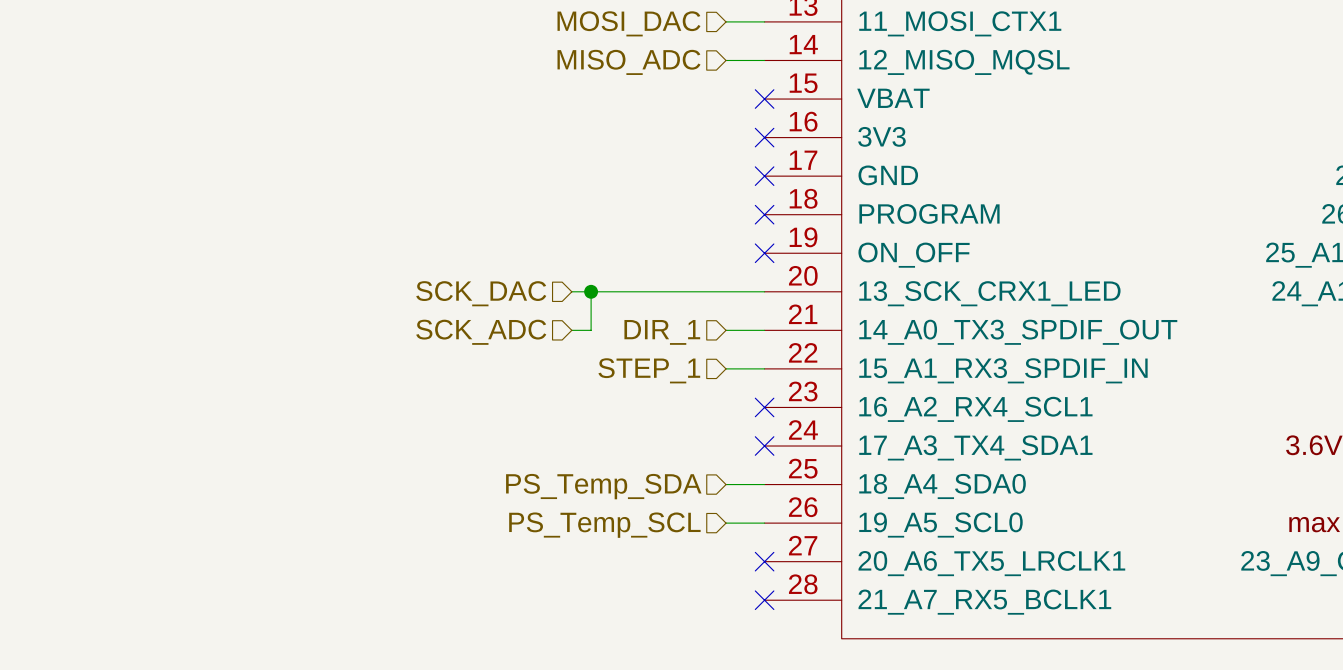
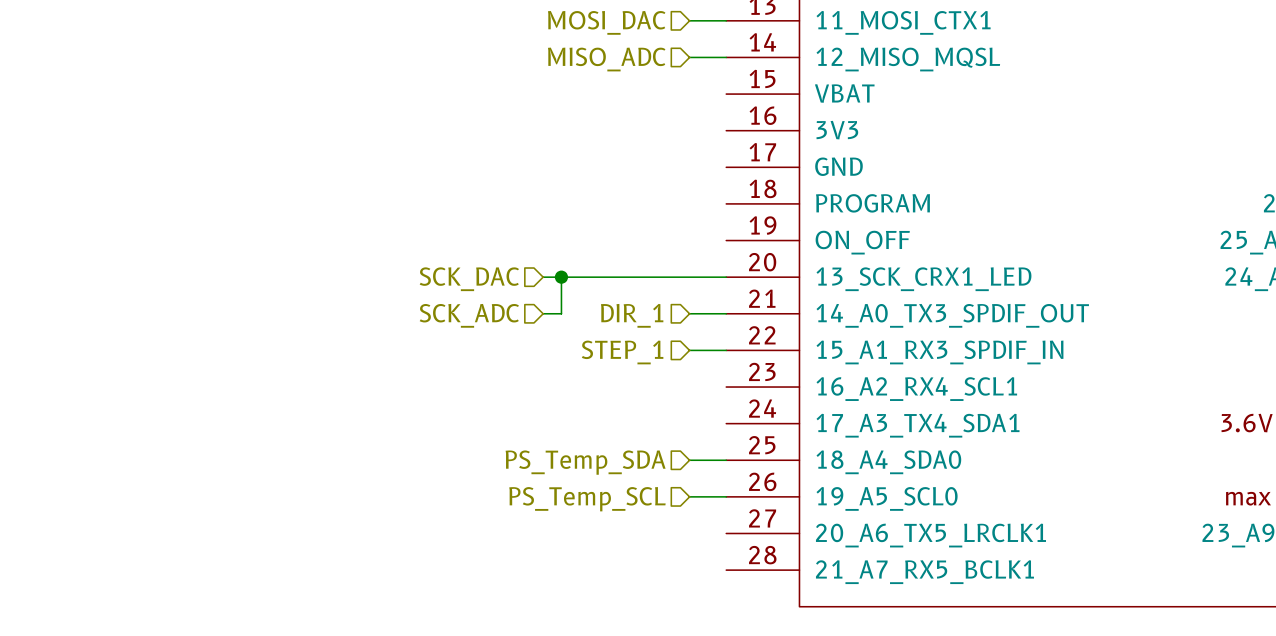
no-connect mark: (764, 99) -> none
no-connect mark: (764, 137) -> none
no-connect mark: (764, 176) -> none
no-connect mark: (764, 214) -> none
no-connect mark: (764, 253) -> none
no-connect mark: (764, 407) -> none
no-connect mark: (764, 446) -> none
no-connect mark: (764, 561) -> none
no-connect mark: (764, 600) -> none

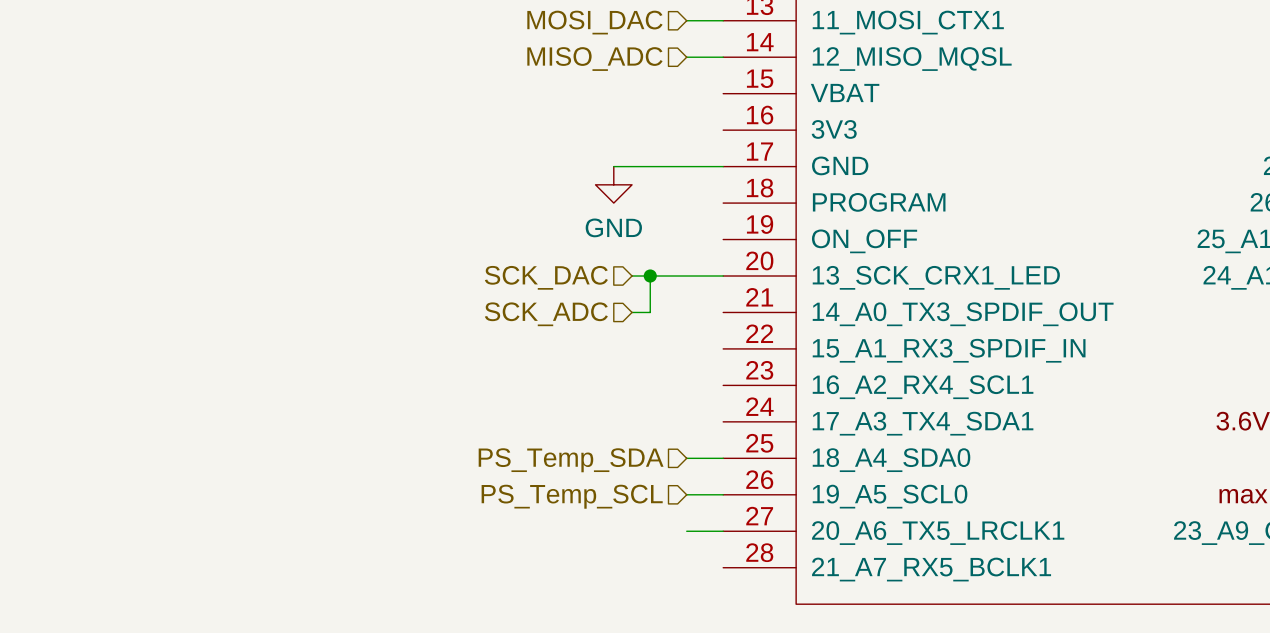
wire: none -> (613, 166) (723, 166)
power symbol: none -> GND (613, 184)
wire: (543, 277) (634, 277) -> none
wire: (561, 277) (561, 313) (543, 313) -> (650, 276) (650, 312) (632, 312)
junction: (561, 277) -> none
junction: none -> (650, 276)
hierarchical label position: SCK_DAC (469, 279) -> SCK_DAC (546, 277)
wire: (689, 313) (726, 313) -> none
hierarchical label position: SCK_ADC (469, 315) -> SCK_ADC (546, 314)
hierarchical label: DIR_1 (632, 315) -> none
wire: (689, 350) (726, 350) -> (686, 531) (723, 531)
hierarchical label: STEP_1 (622, 352) -> none

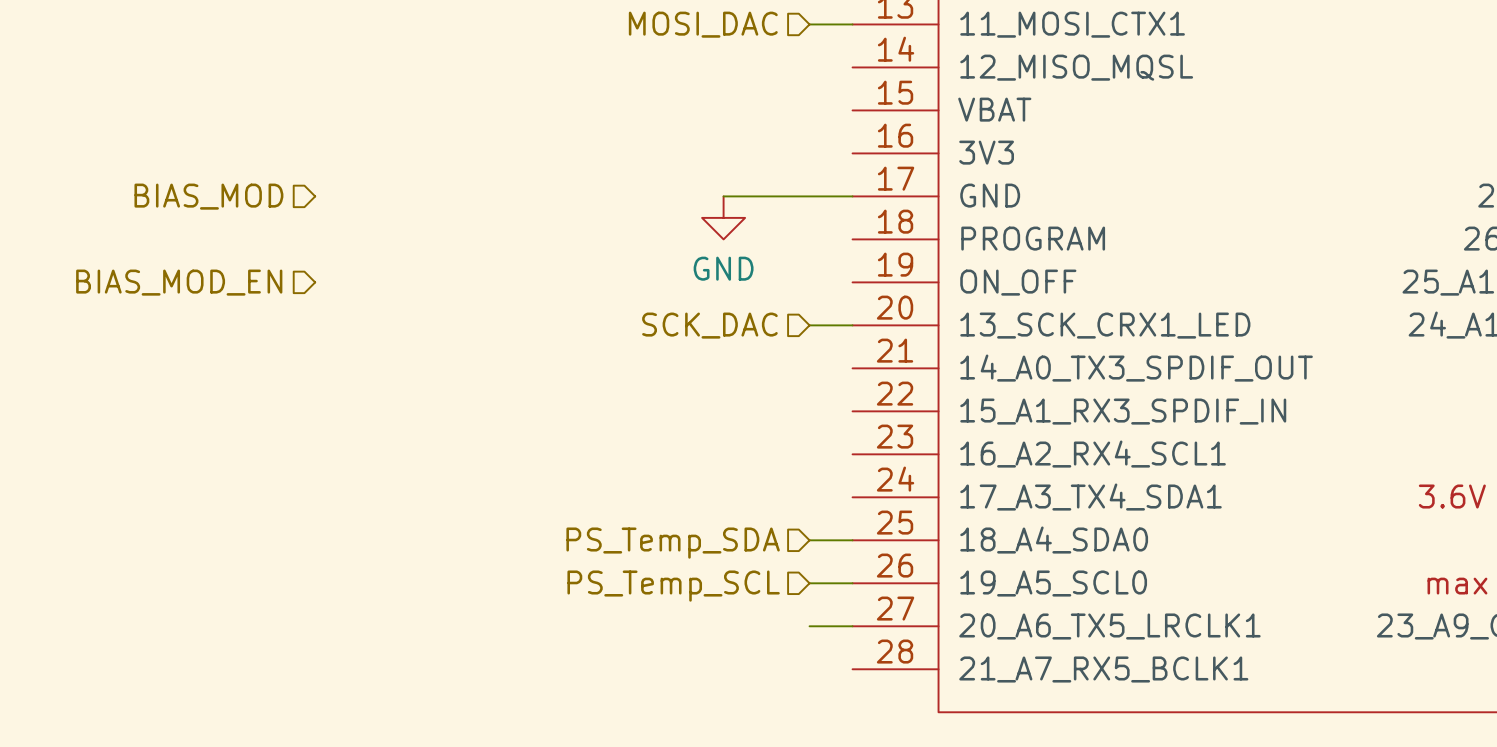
wire: (686, 57) (723, 57) -> none
hierarchical label: MISO_ADC (594, 59) -> none
hierarchical label: none -> BIAS_MOD (208, 196)
hierarchical label: none -> BIAS_MOD_EN (179, 282)
wire: (632, 276) (686, 276) -> none
wire: (650, 276) (650, 312) (632, 312) -> none
junction: (650, 276) -> none
hierarchical label position: SCK_DAC (546, 277) -> SCK_DAC (709, 325)
hierarchical label: SCK_ADC (546, 314) -> none

